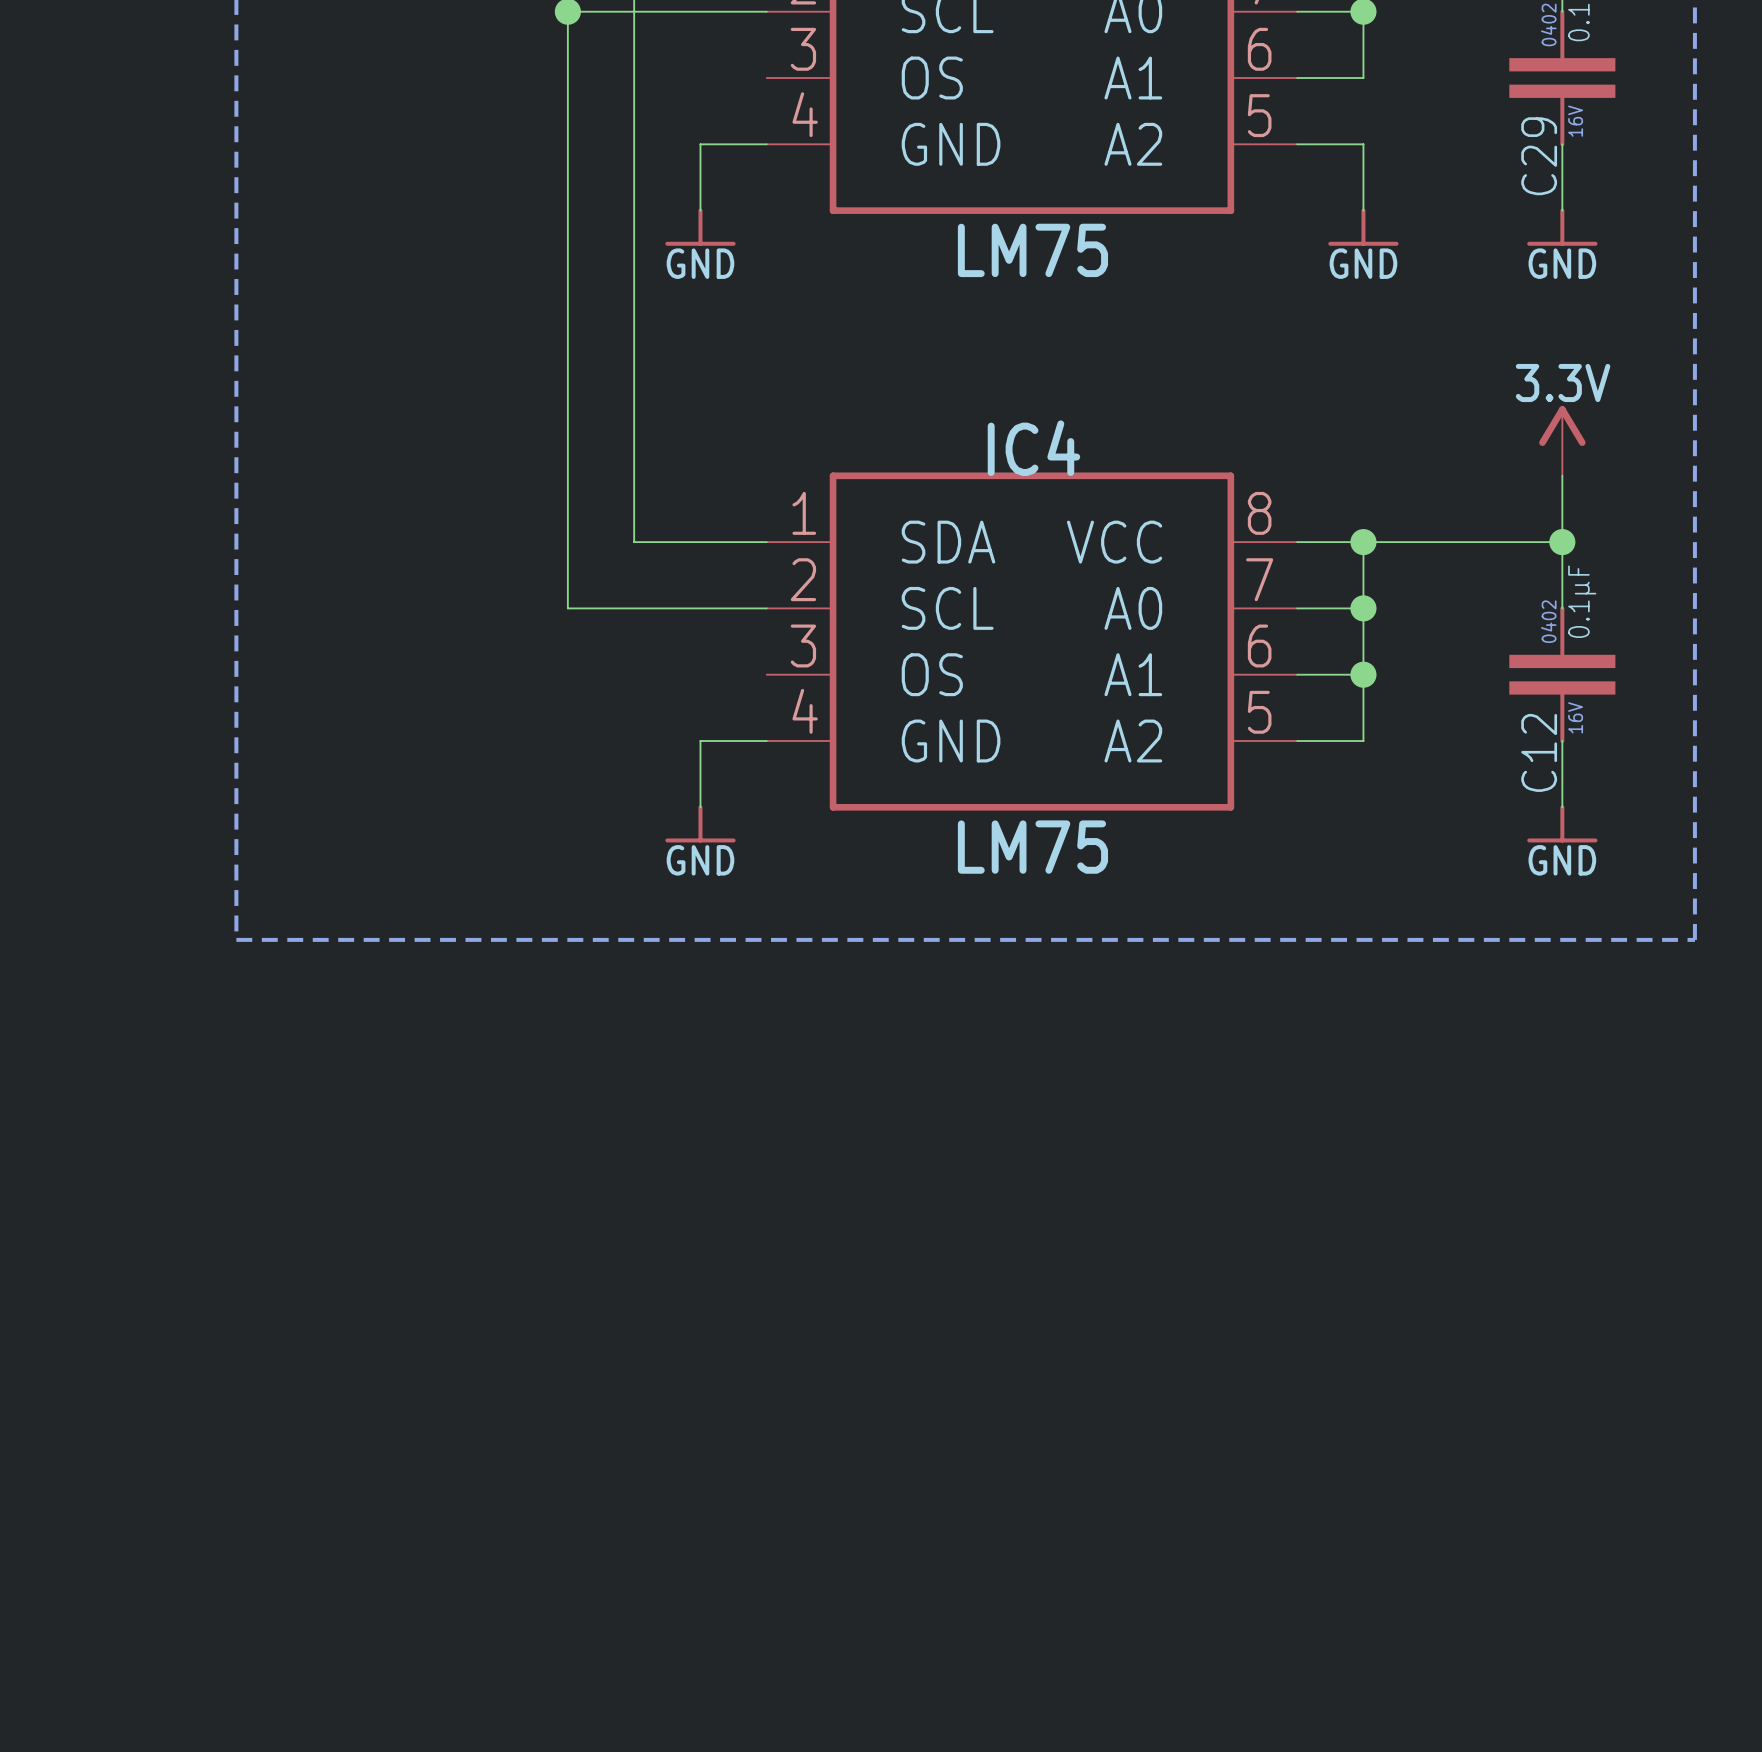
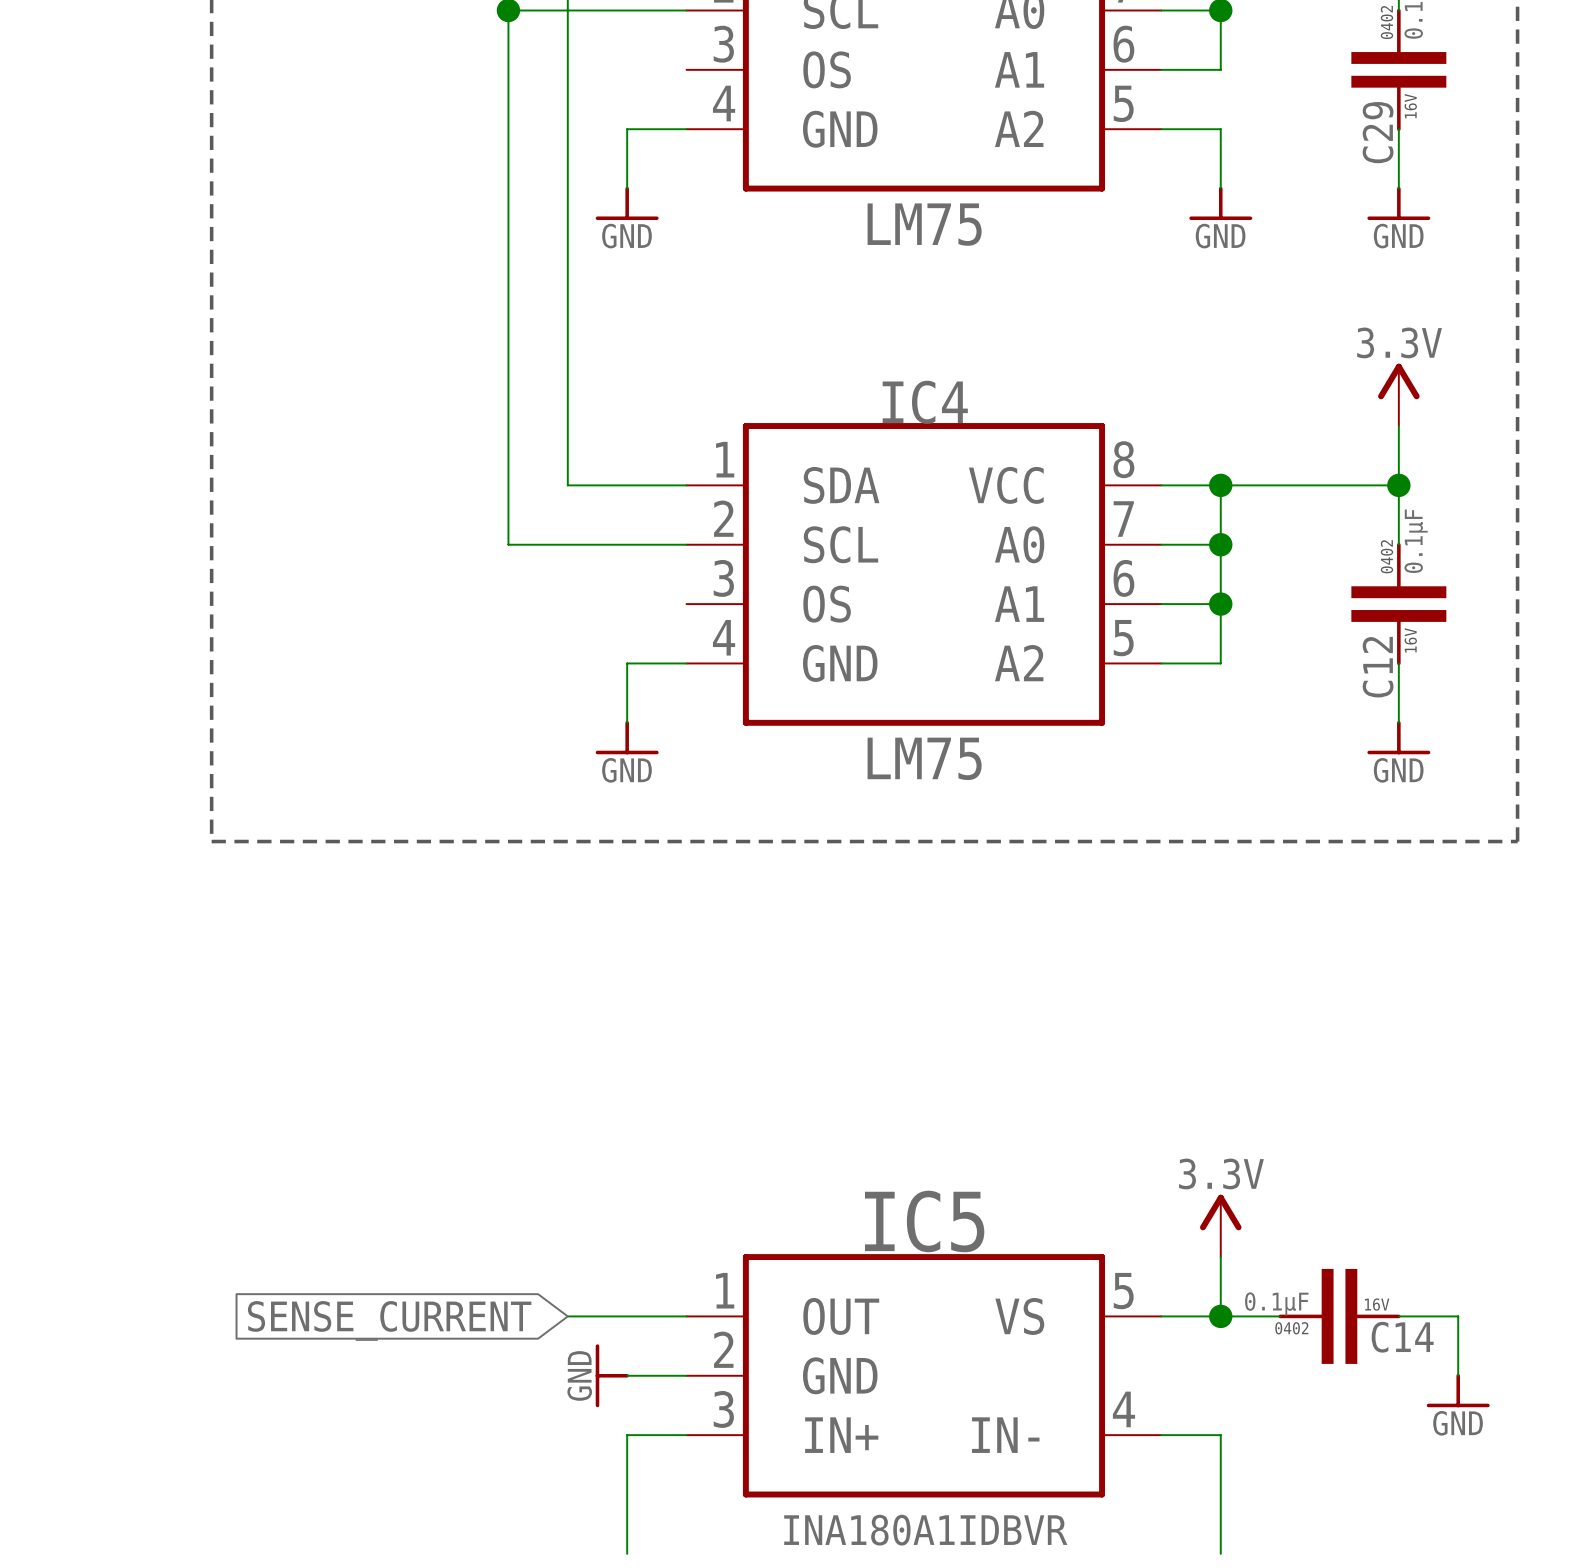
power symbol: none -> 3.3V (1220, 1225)
wire: none -> (1220, 1257) (1220, 1316)
wire: none -> (567, 1316) (686, 1316)
wire: none -> (1161, 1316) (1280, 1316)
junction: none -> (1220, 1316)
C14: none -> 0.1µF (1339, 1316)
wire: none -> (1398, 1316) (1458, 1316) (1458, 1375)
global label: none -> SENSE_CURRENT (389, 1320)
power symbol: none -> GND (612, 1375)
wire: none -> (627, 1375) (686, 1375)
IC5: none -> (923, 1375)
power symbol: none -> GND (1458, 1390)
wire: none -> (686, 1435) (627, 1435) (627, 1553)
wire: none -> (1161, 1435) (1220, 1435) (1220, 1553)

